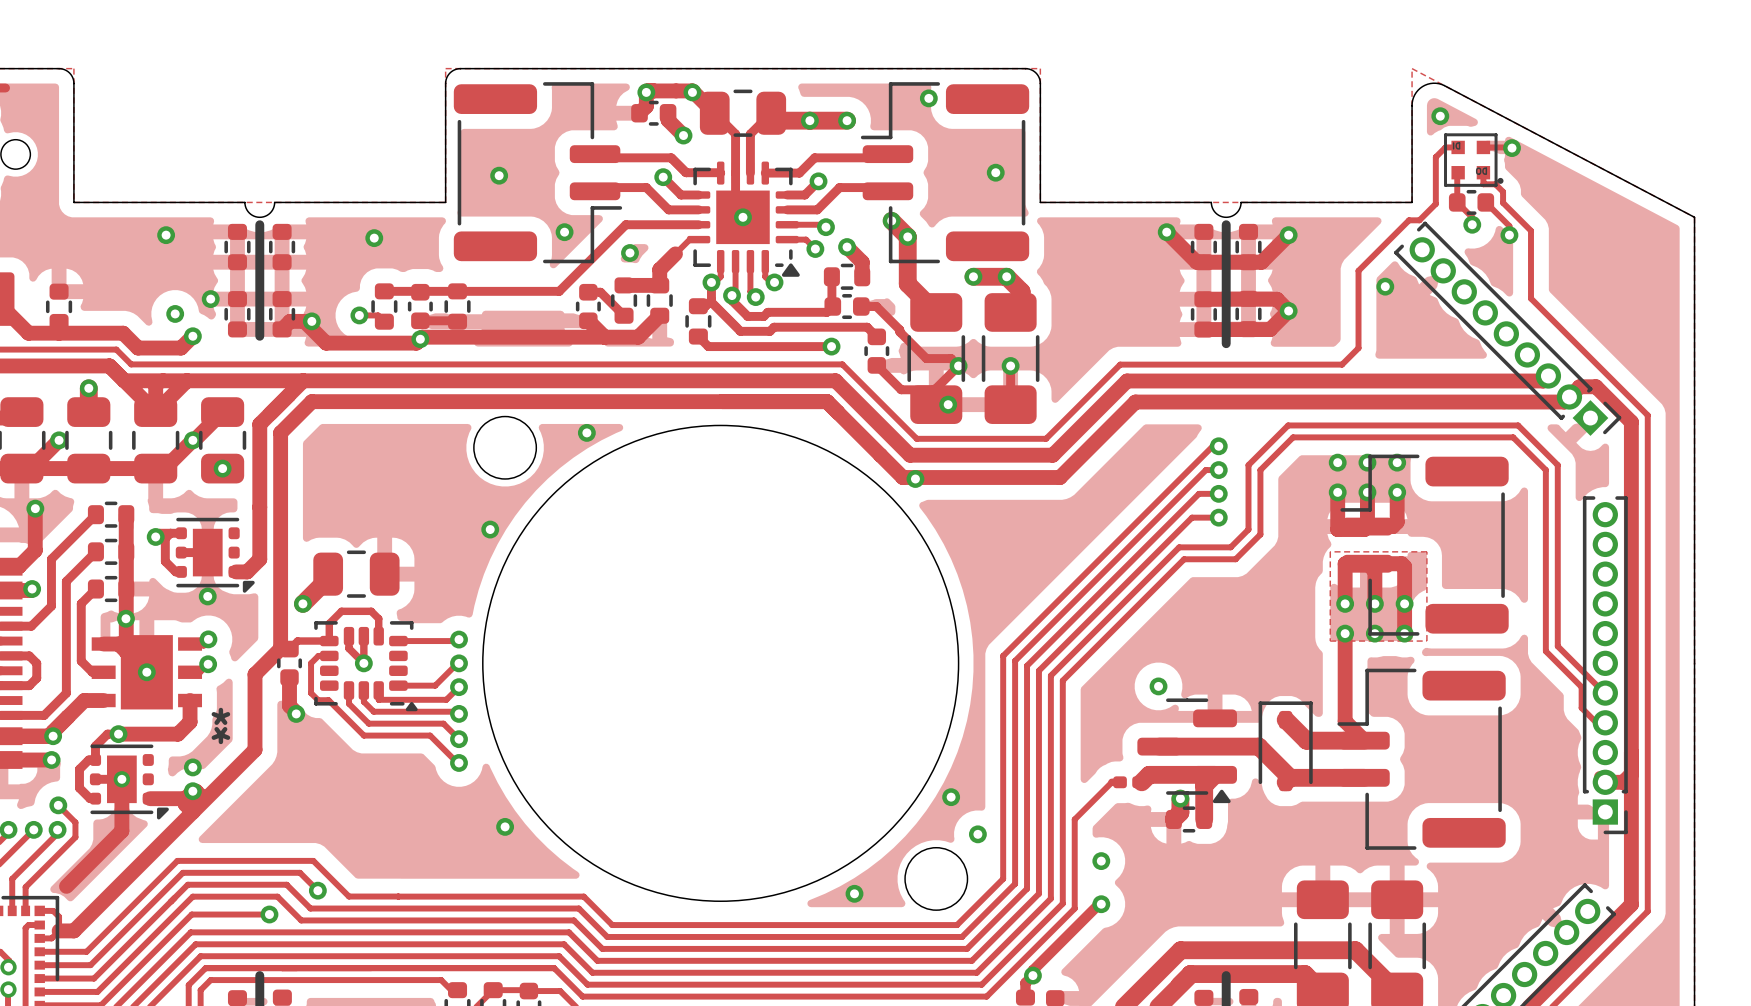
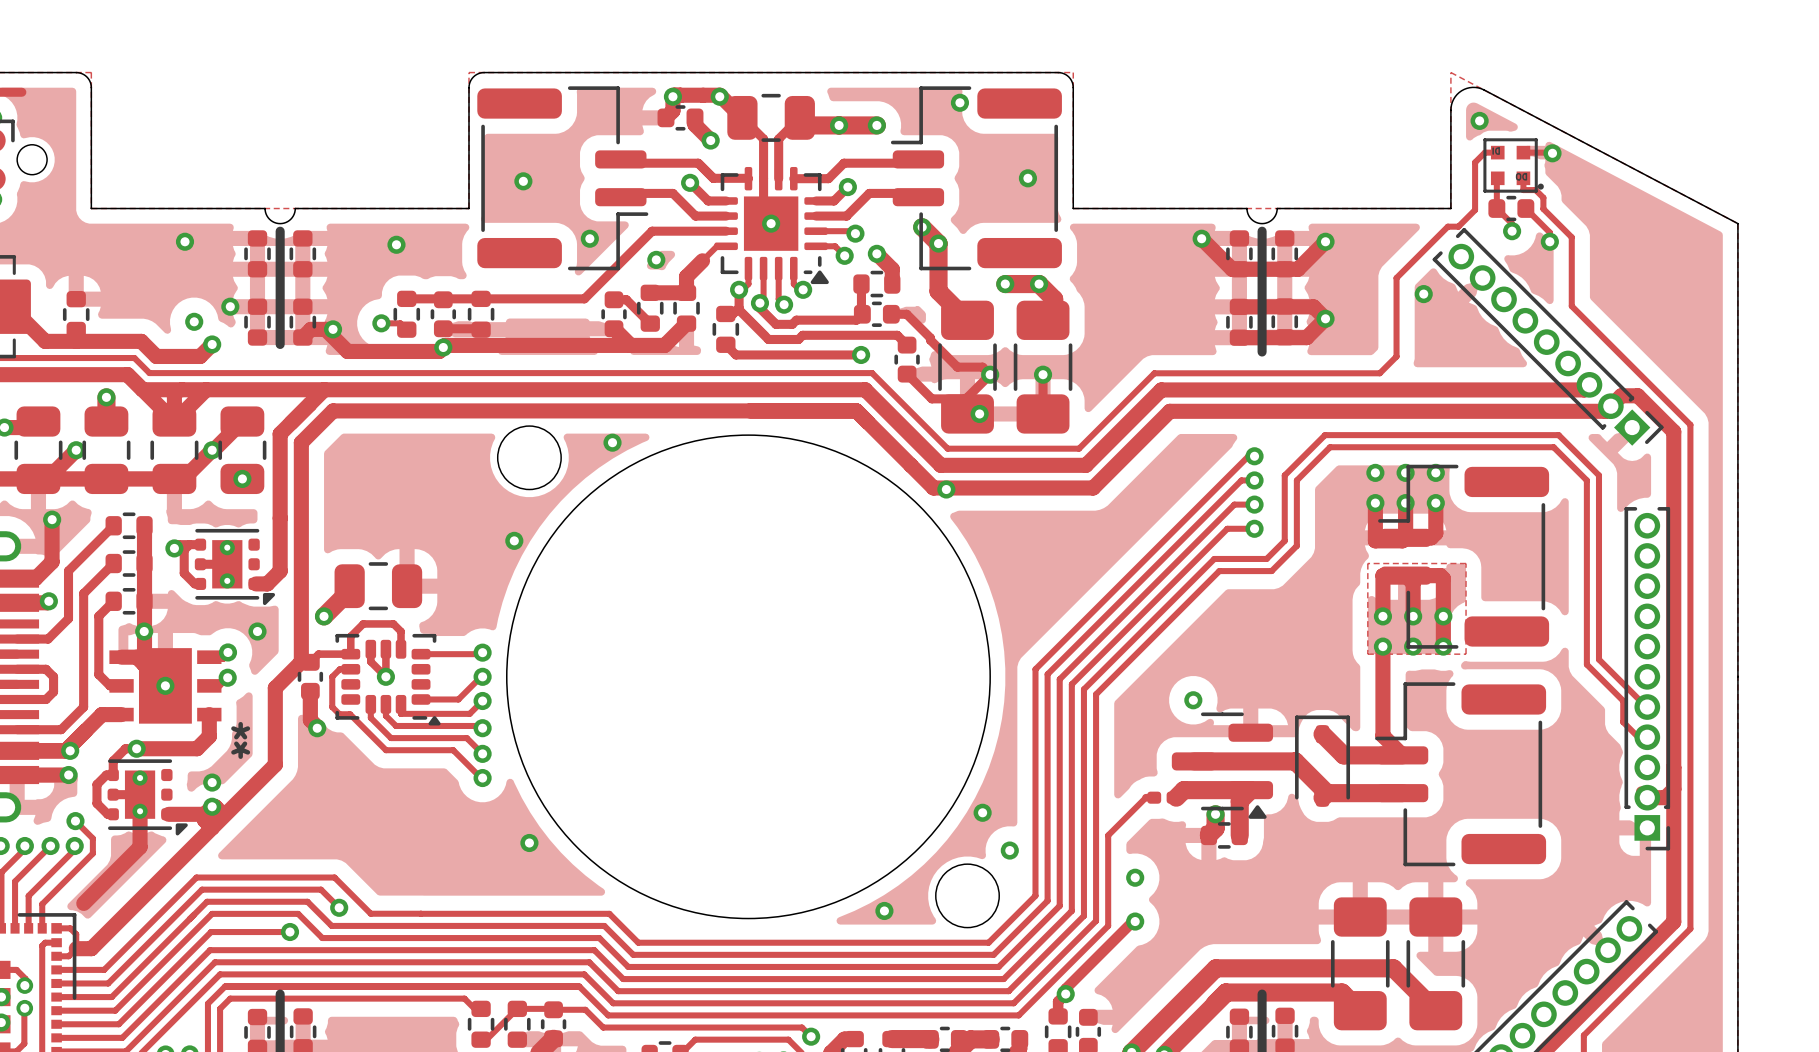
part footprint: [175, 517, 255, 593] -> [194, 528, 276, 606]
via position: (207, 596) -> (257, 631)
part footprint: [89, 744, 169, 820] -> [107, 759, 188, 836]
via: (121, 779) -> none

